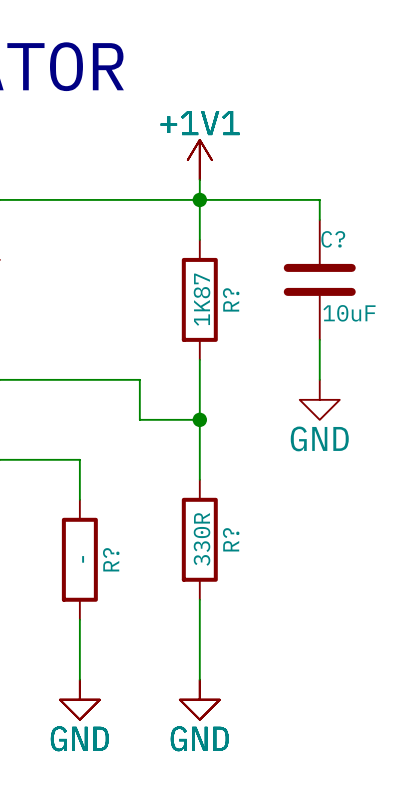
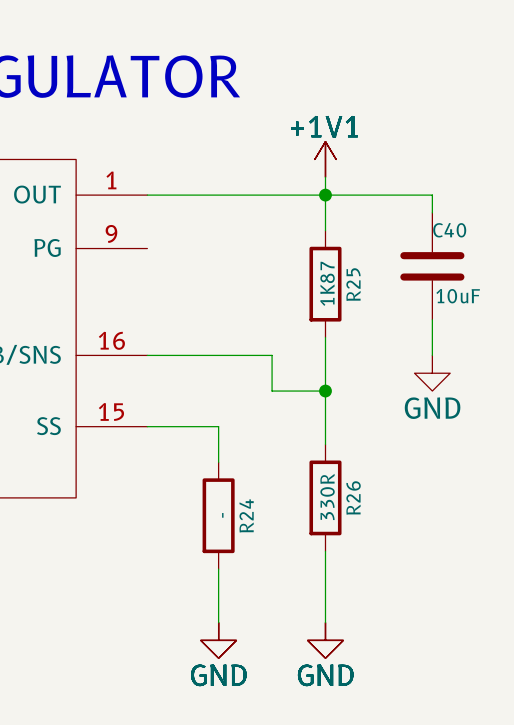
C? name: C? (333, 239) -> C40 (449, 230)
R? name: R? (231, 299) -> R25 (353, 284)
R? name: R? (231, 539) -> R26 (353, 498)
R? name: R? (111, 559) -> R24 (246, 515)

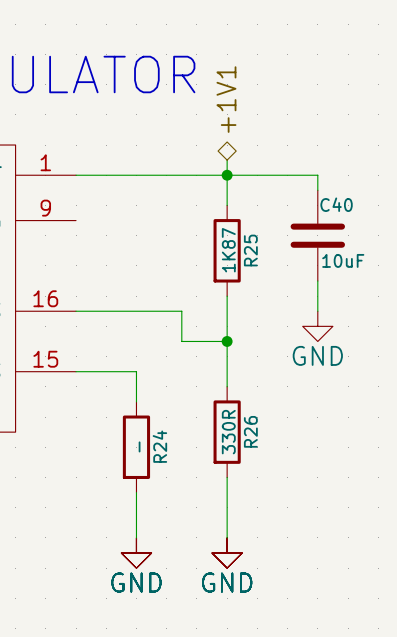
hierarchical label: none -> +1V1 (226, 99)
power symbol: +1V1 (325, 159) -> none

